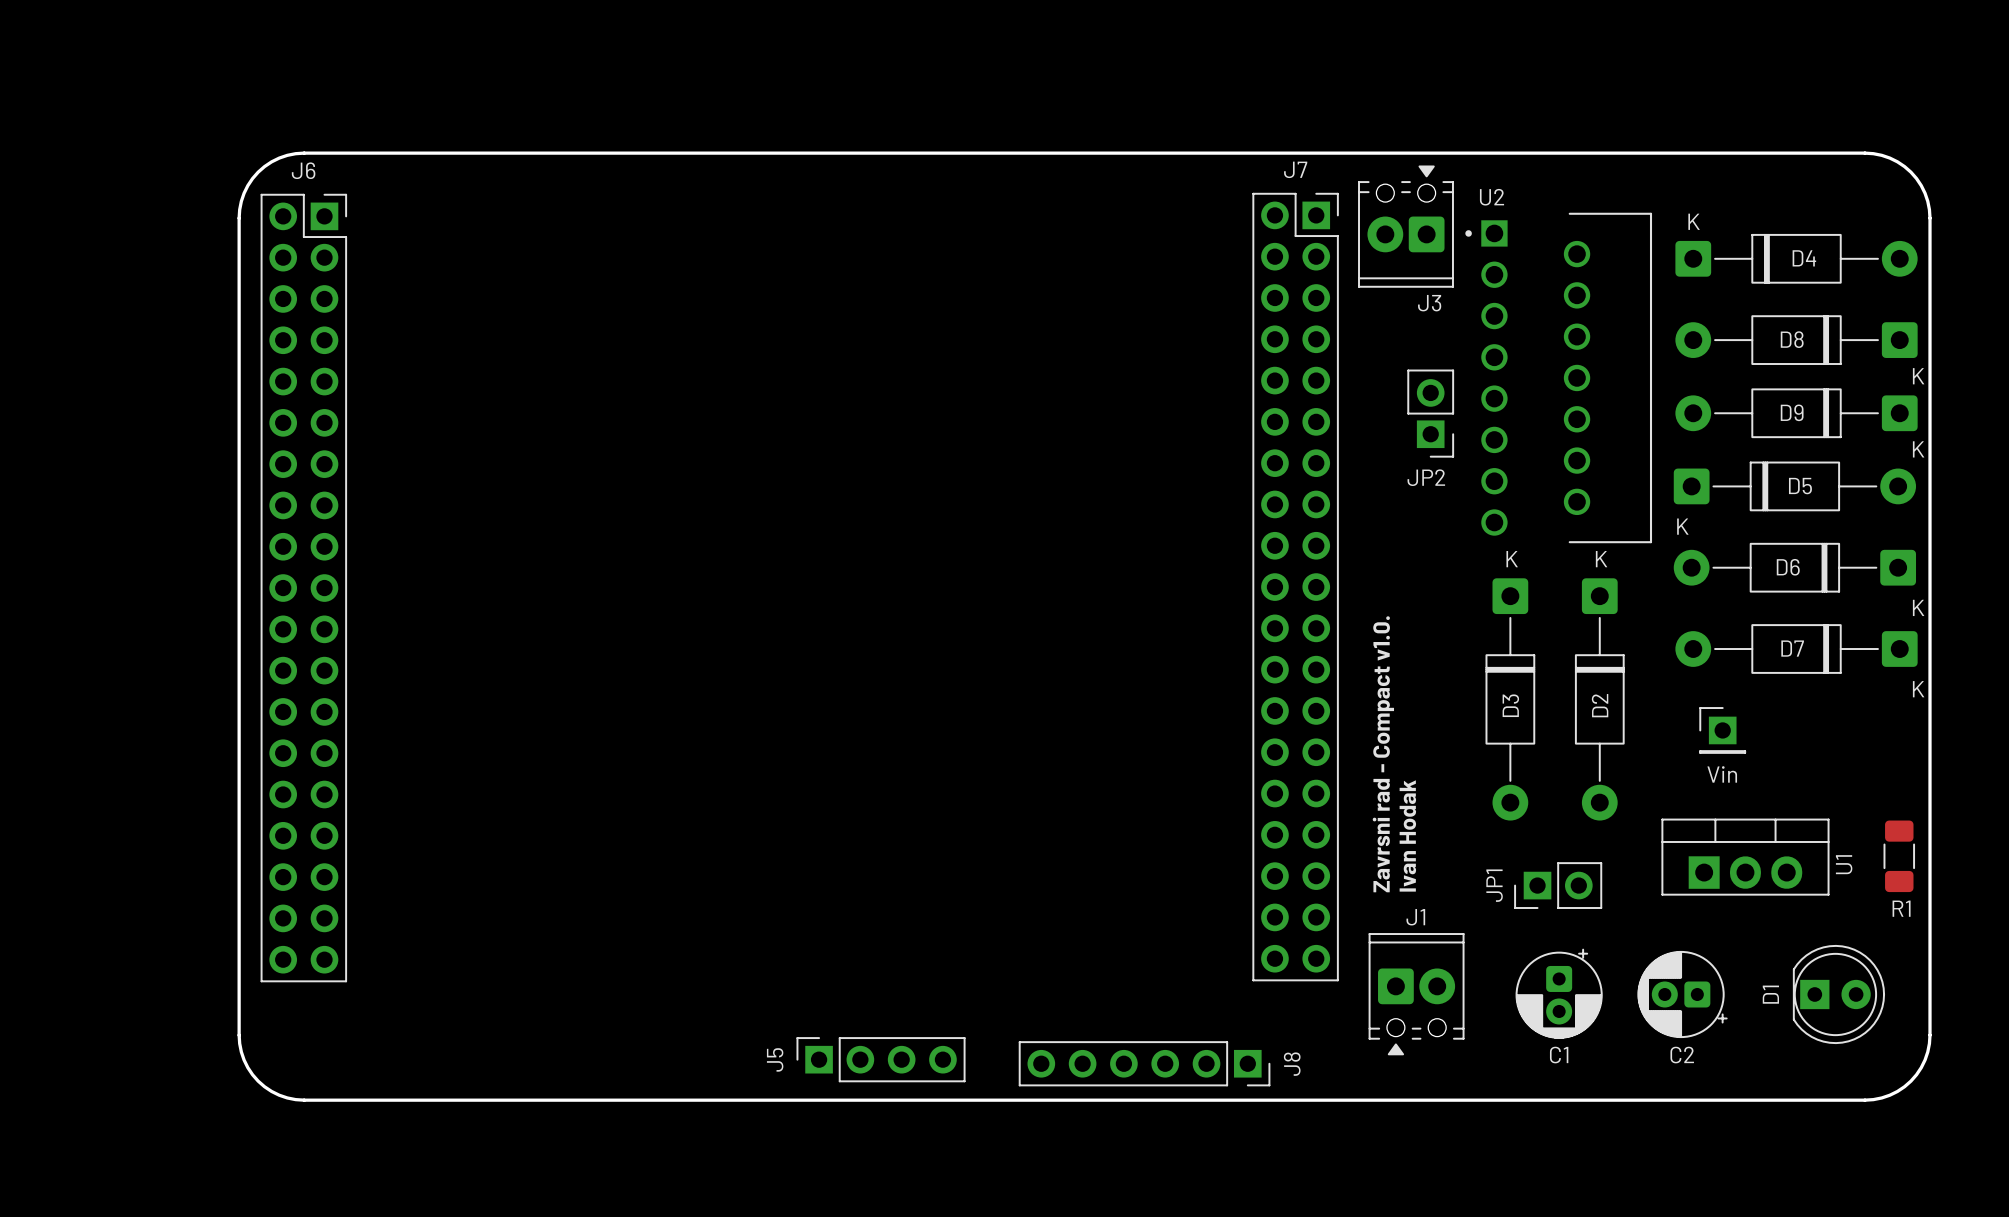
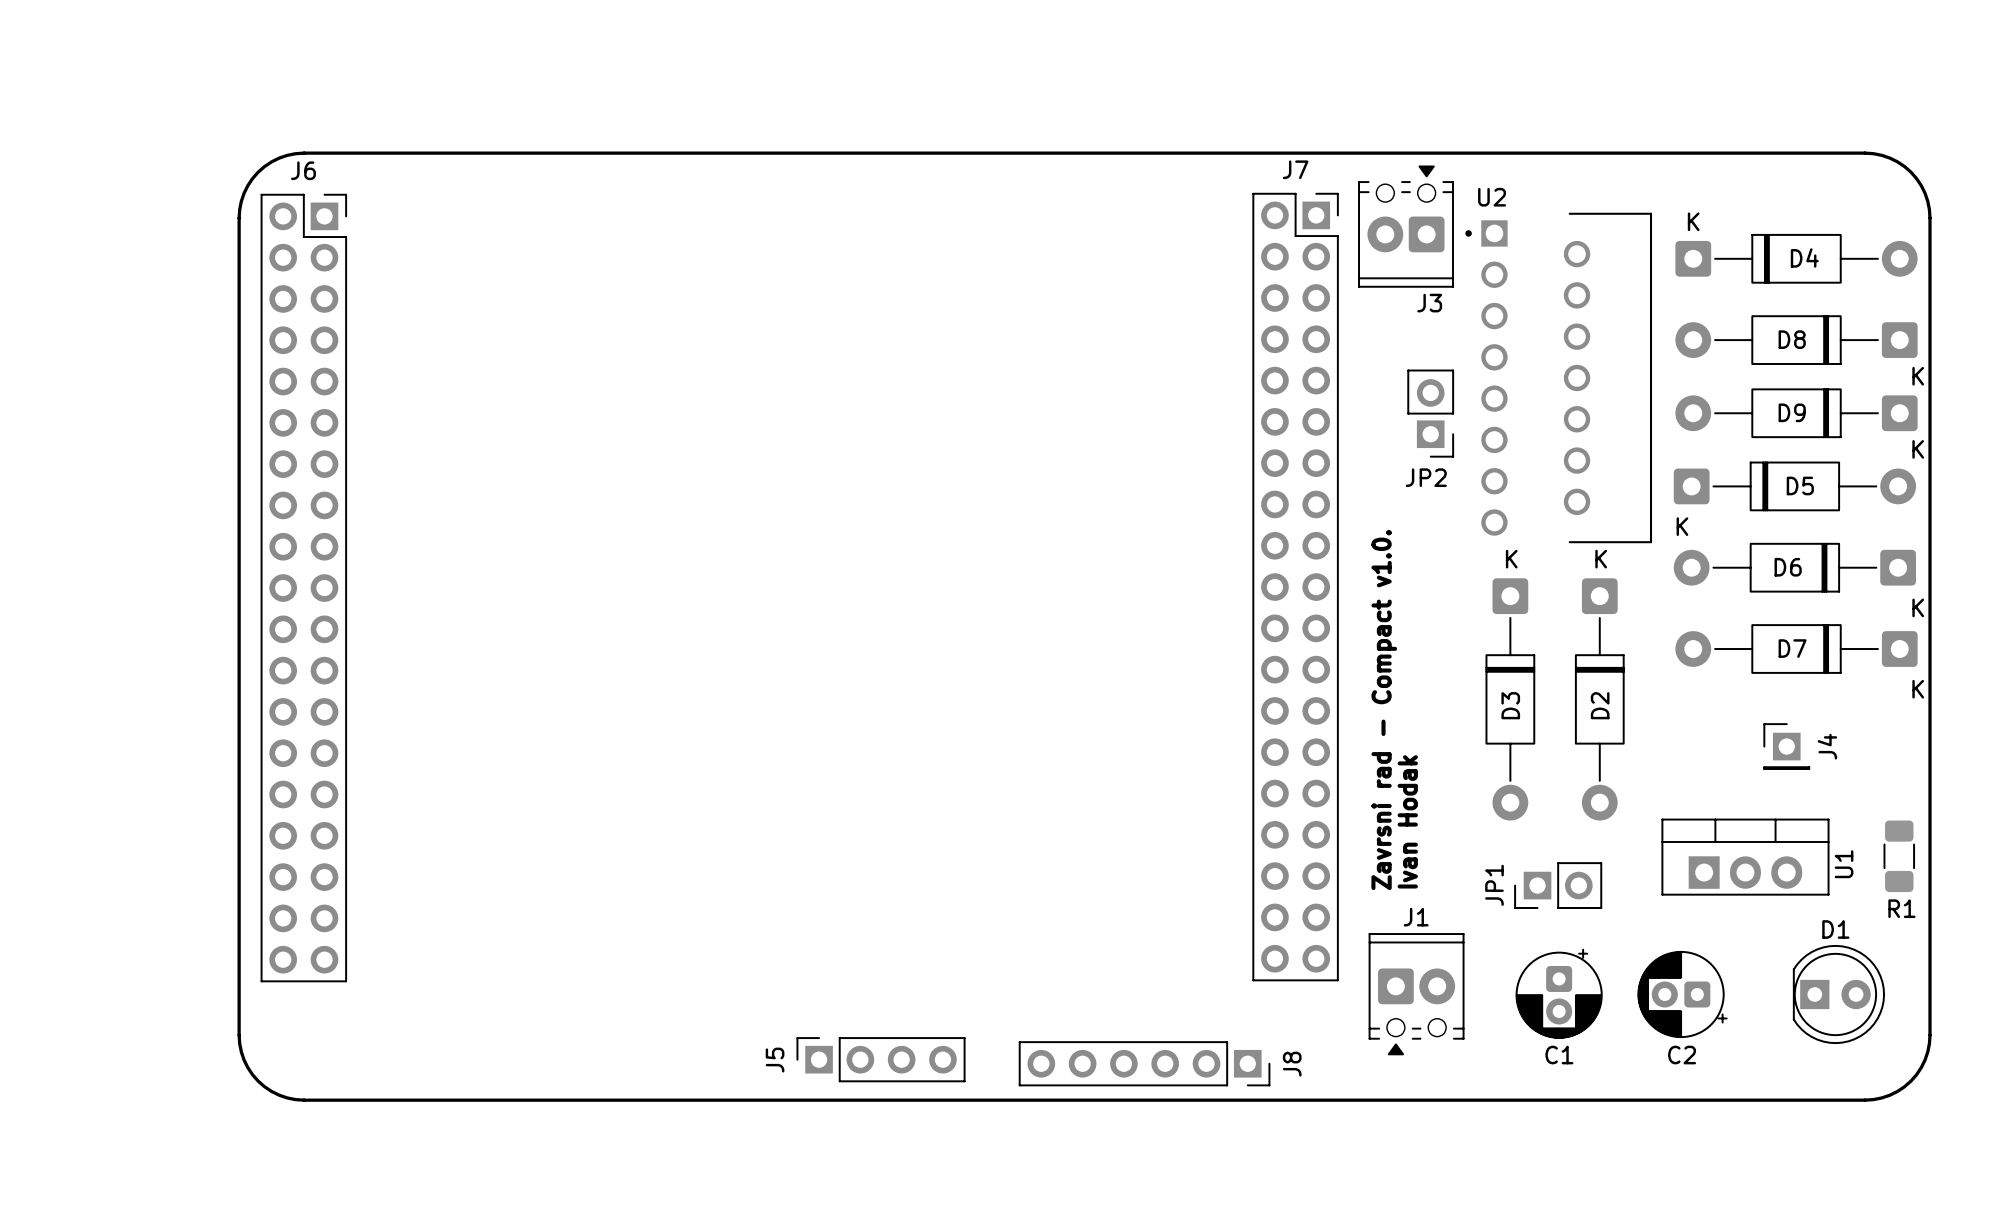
Vin: (1722, 730) -> none
J4: none -> (1786, 746)
D1 name rotation: 0° (1770, 994) -> 90° clockwise (1835, 929)
D1 name position: D1 (1770, 994) -> D1 (1835, 929)

